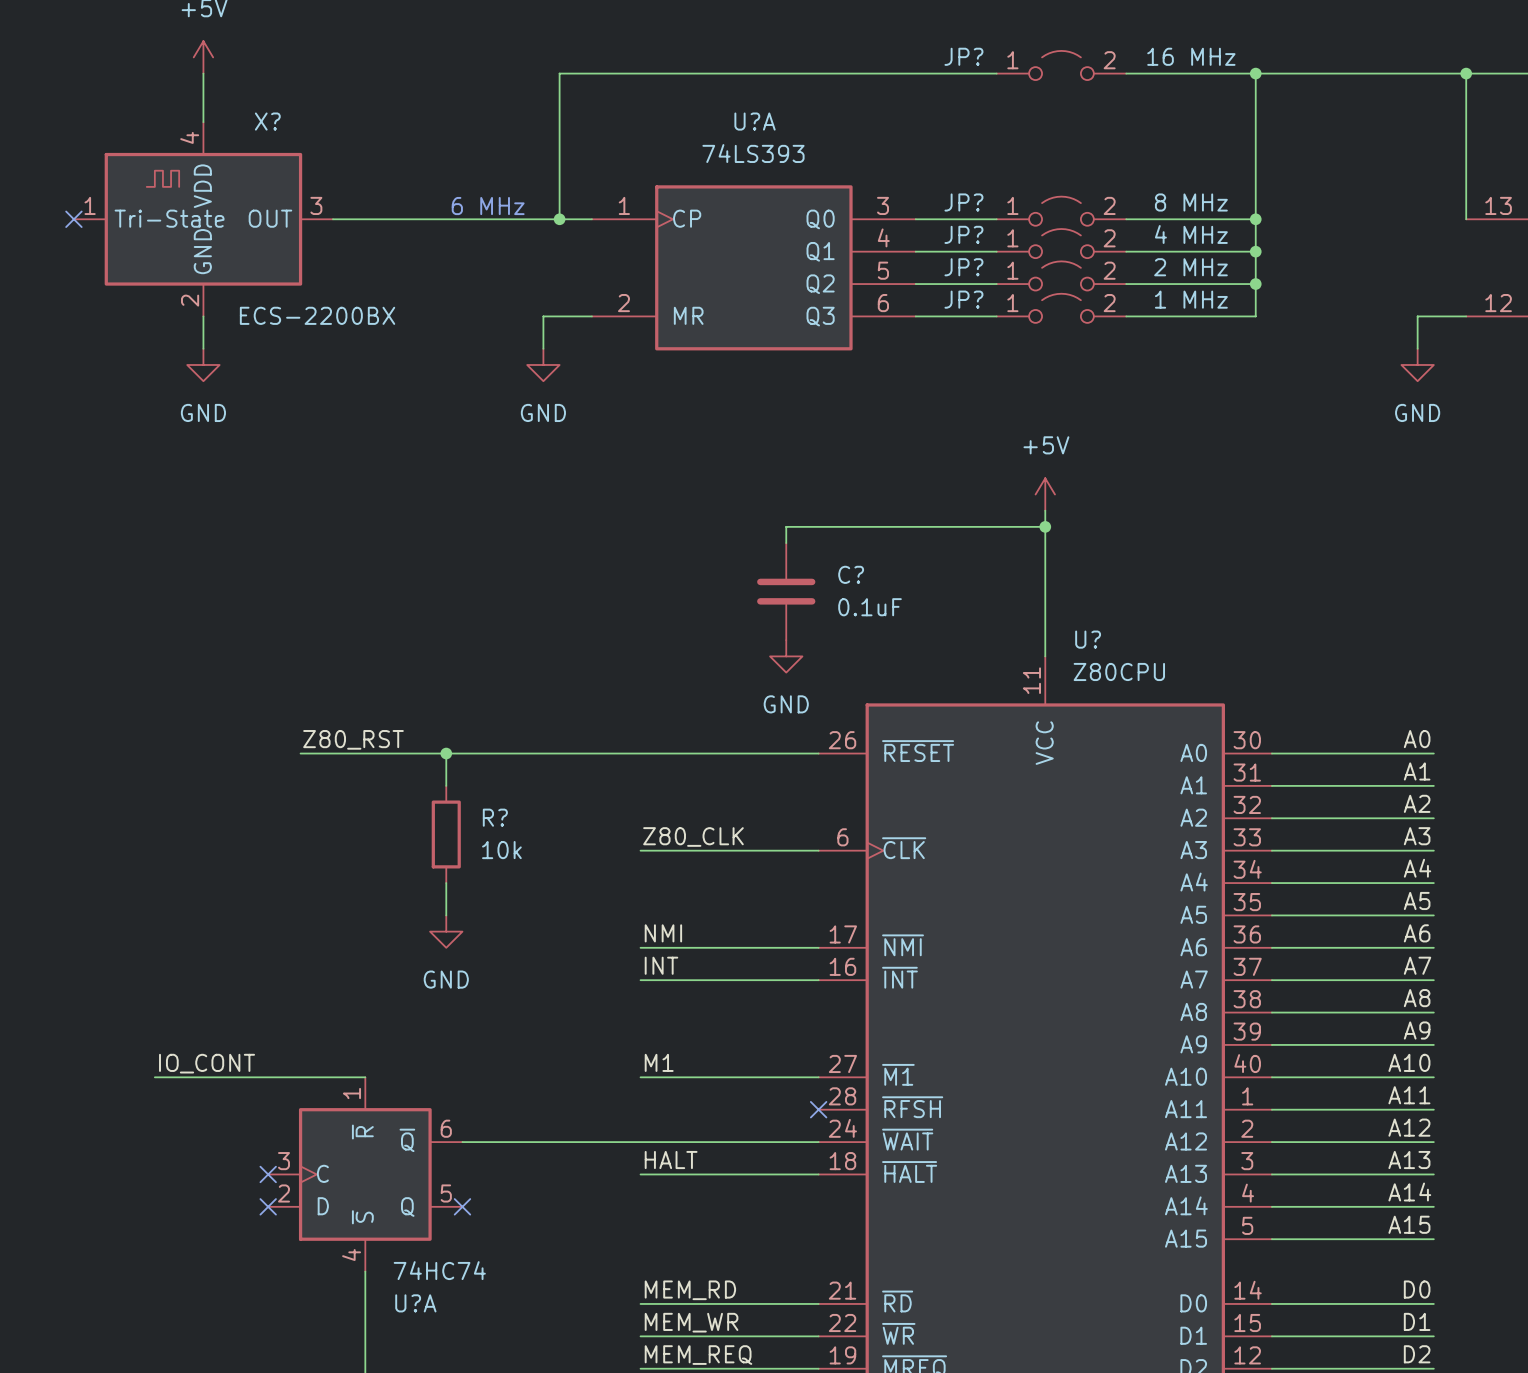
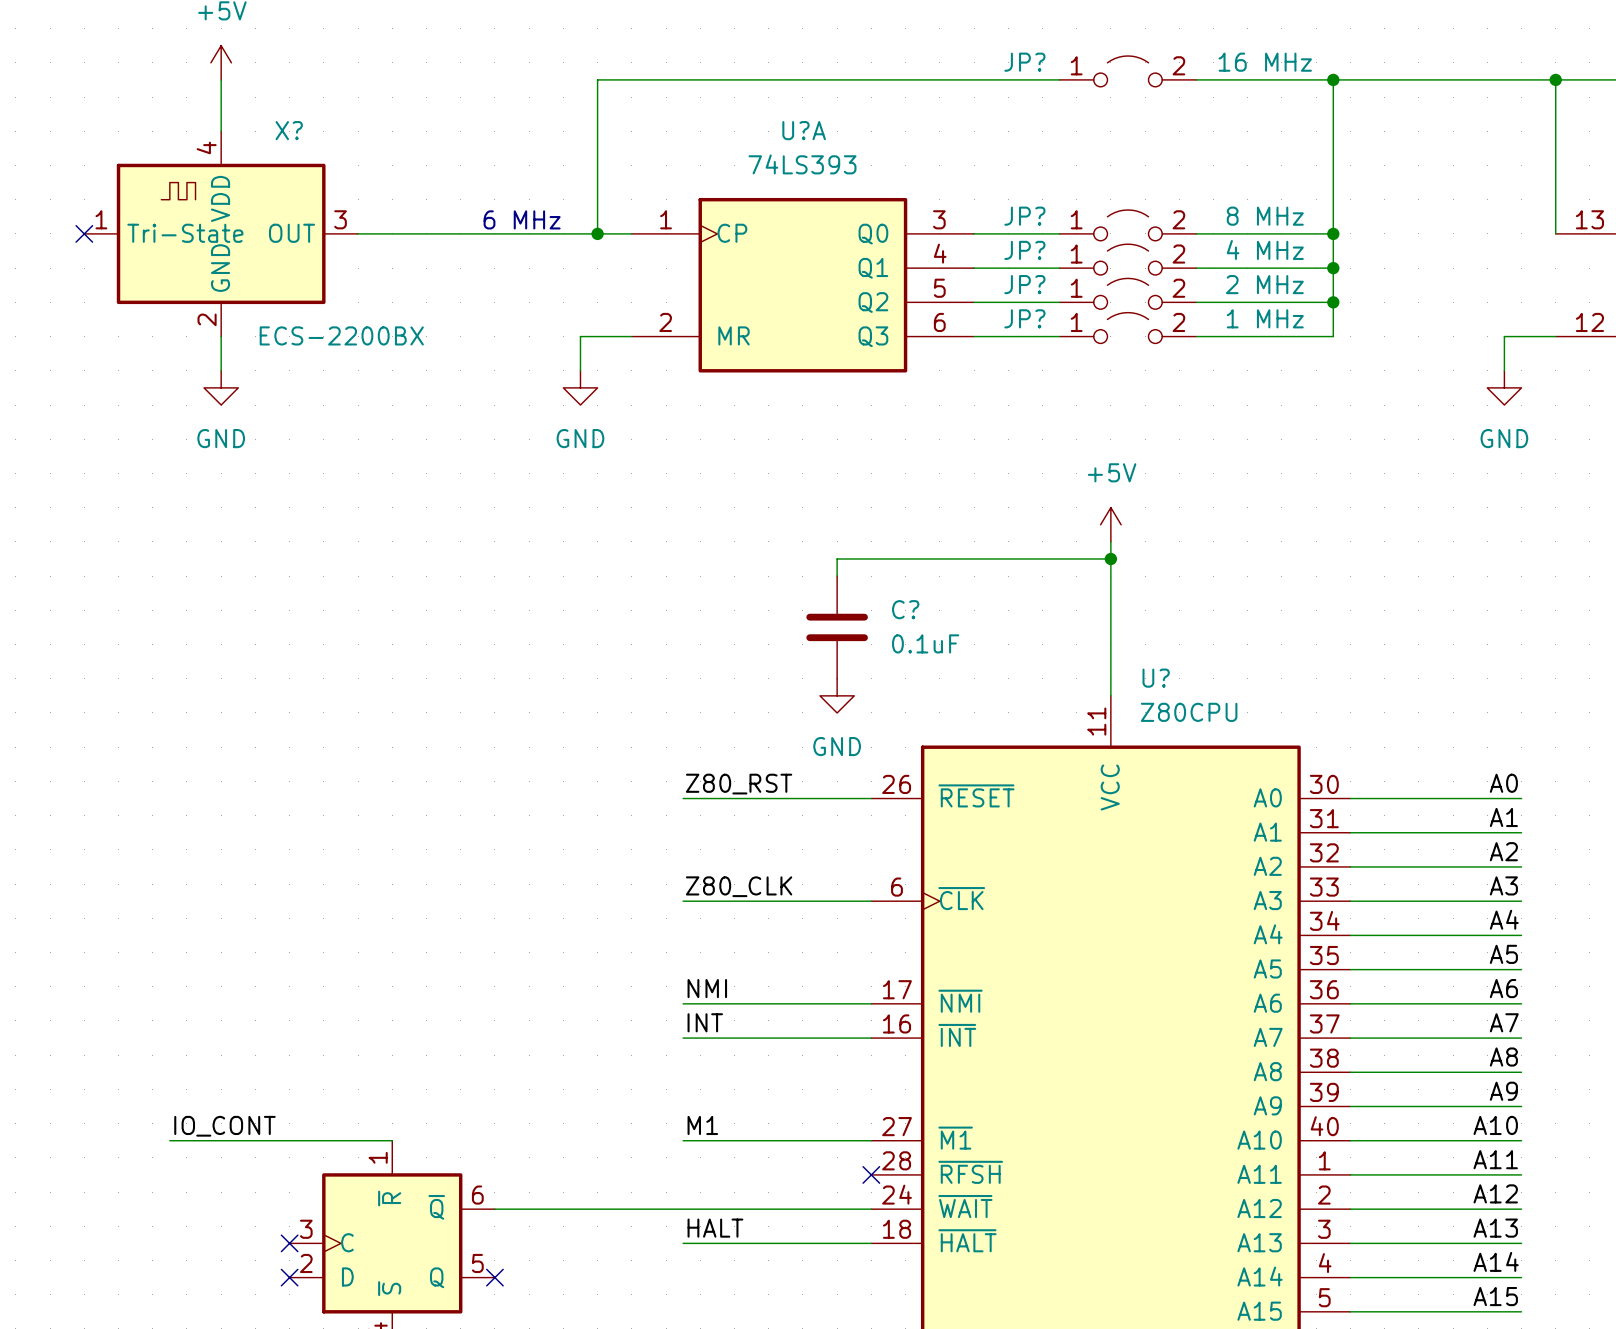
label: Z80_RST (353, 739) -> none
label: none -> Z80_RST (739, 784)
wire: (300, 753) (640, 753) -> none
wire: (446, 753) (446, 785) -> none
junction: (446, 753) -> none
R?: 10k (446, 834) -> none
wire: (446, 883) (446, 915) -> none
power symbol: GND (446, 931) -> none

